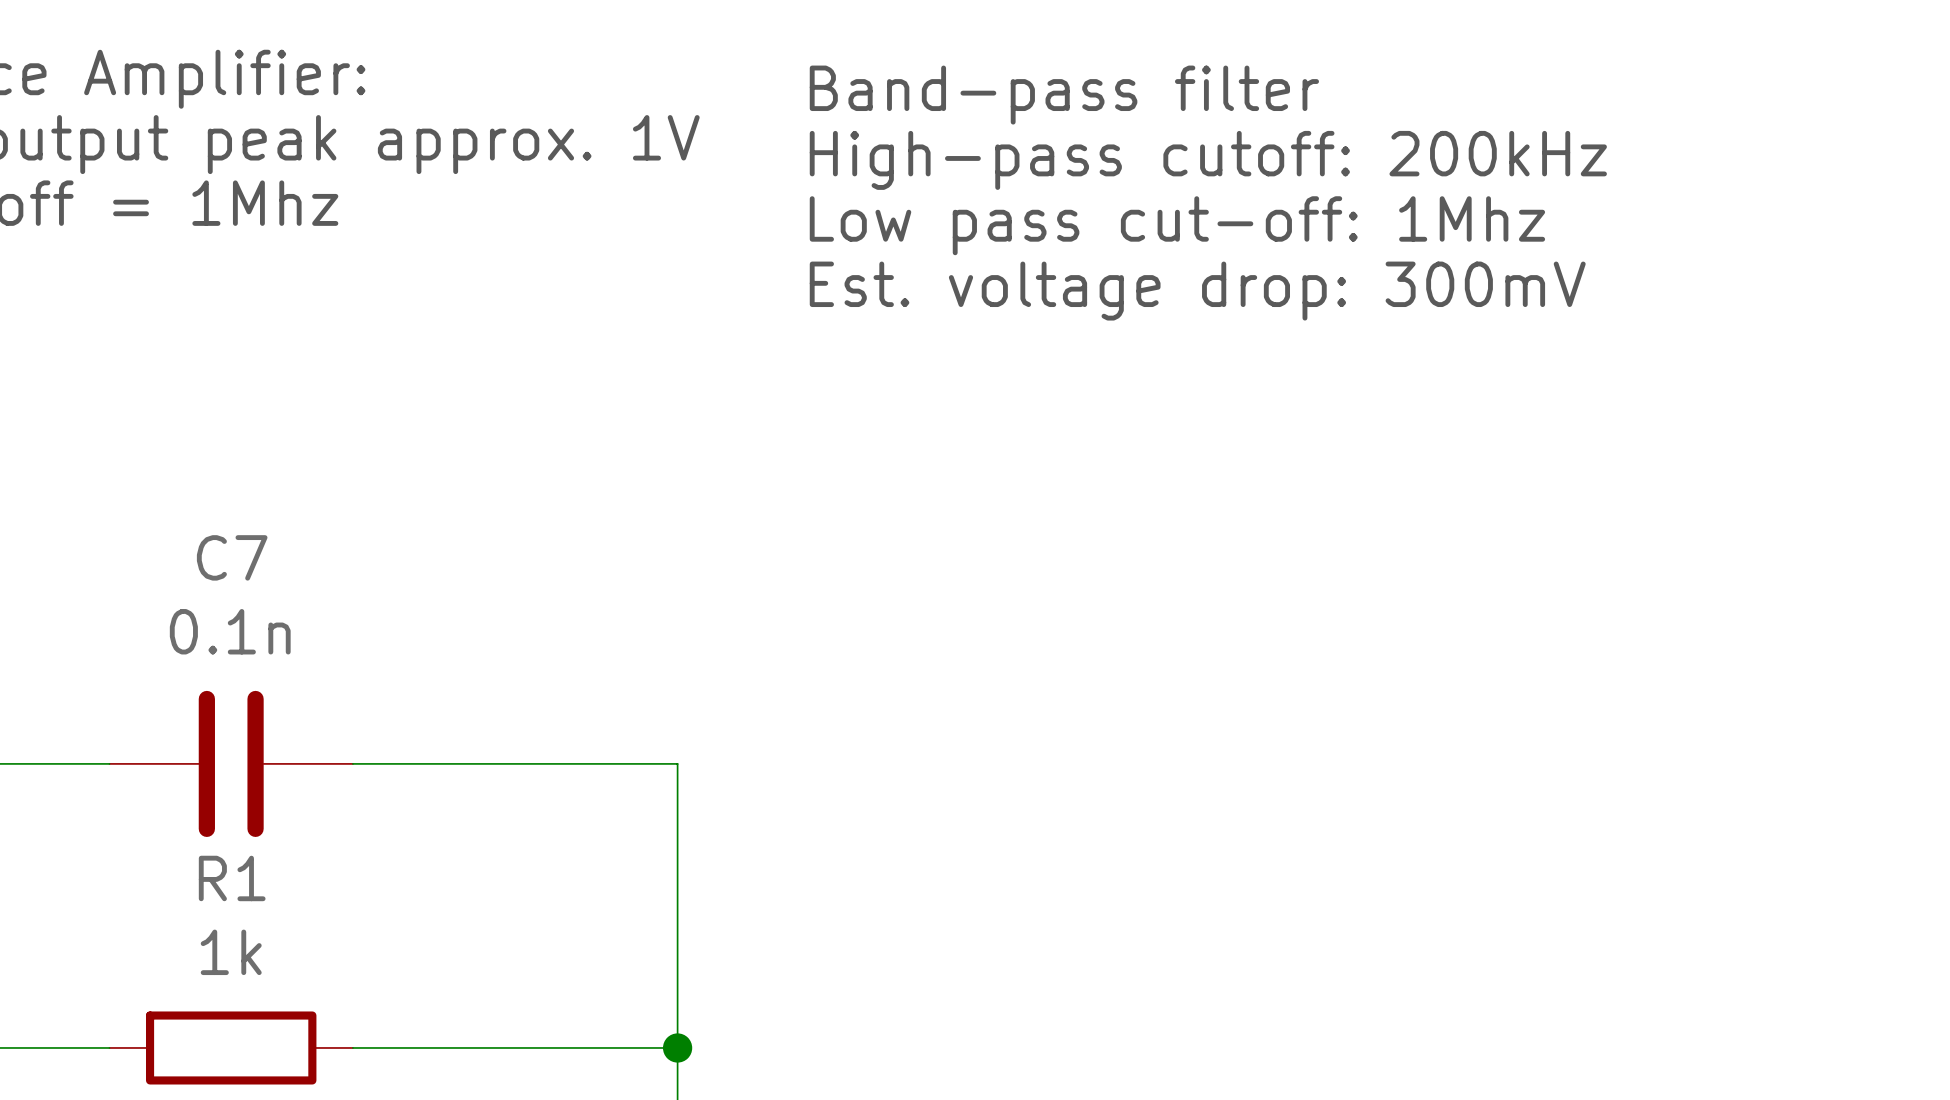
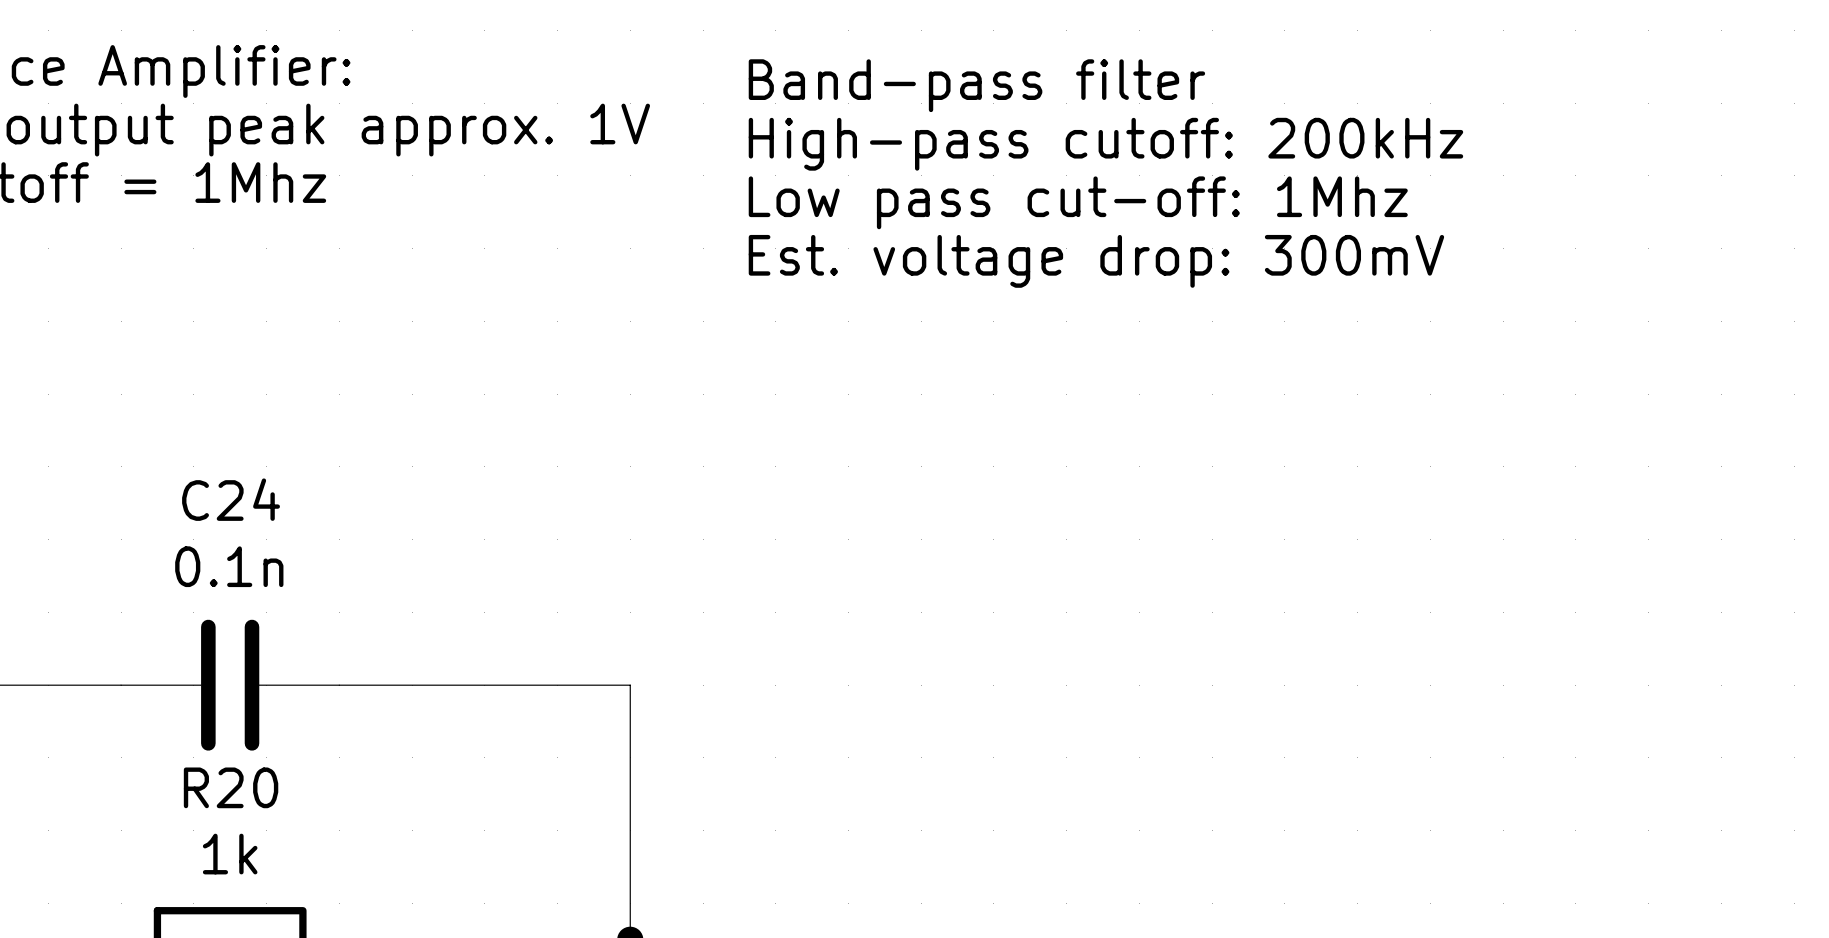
C7 name: C7 (232, 557) -> C24 (231, 499)
R1 name: R1 (232, 878) -> R20 (231, 787)

